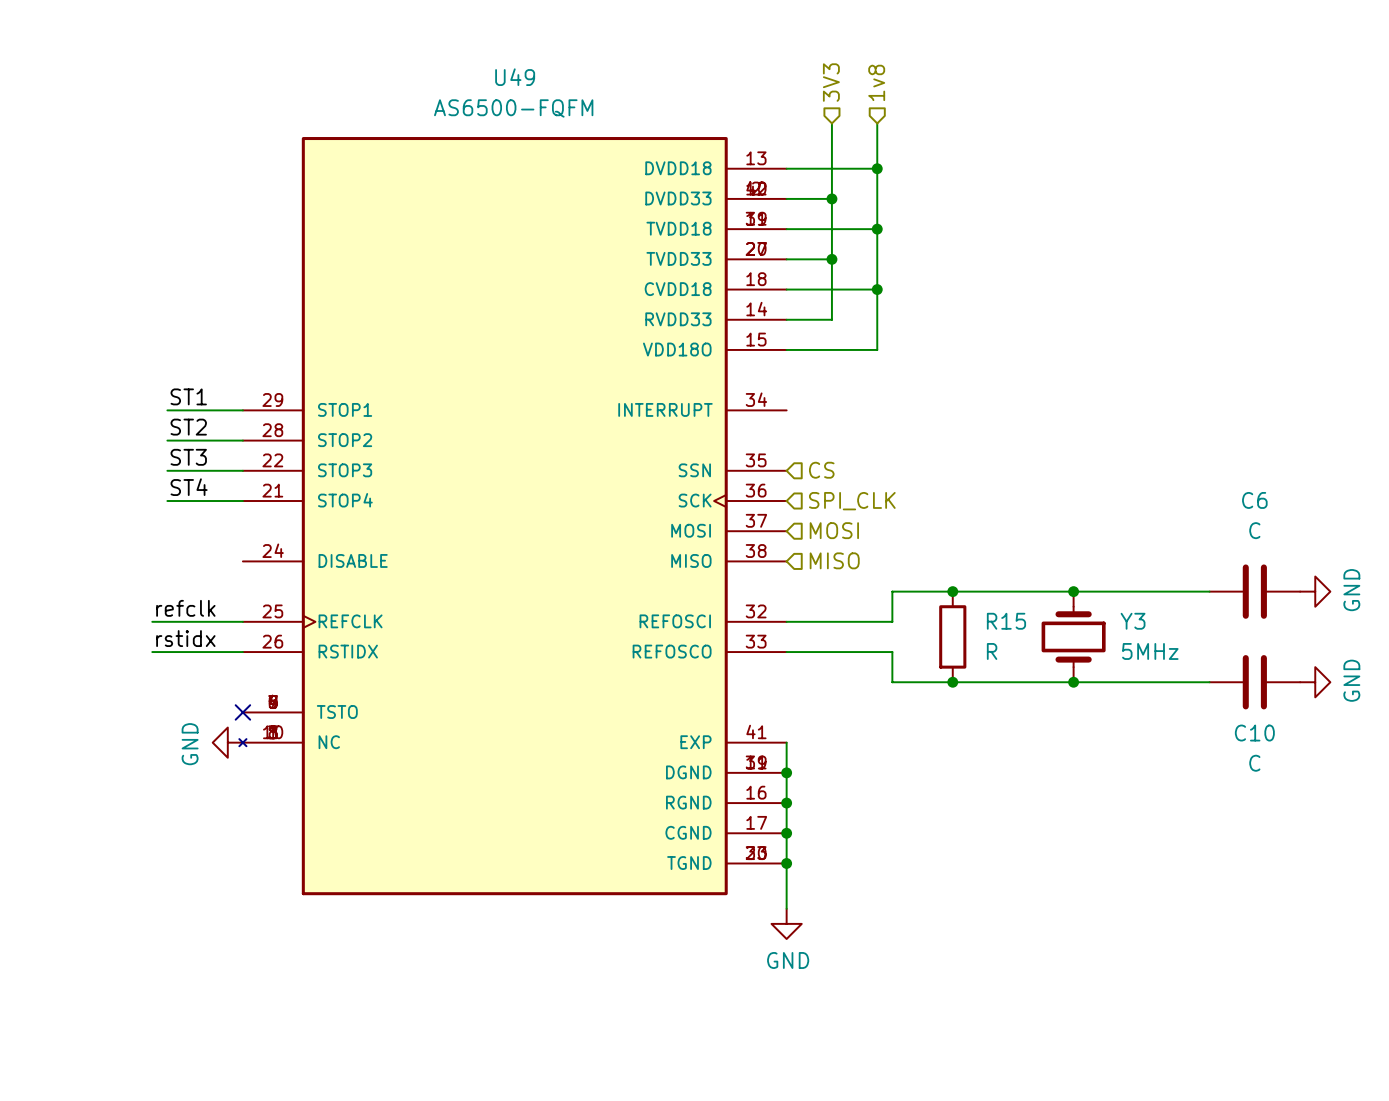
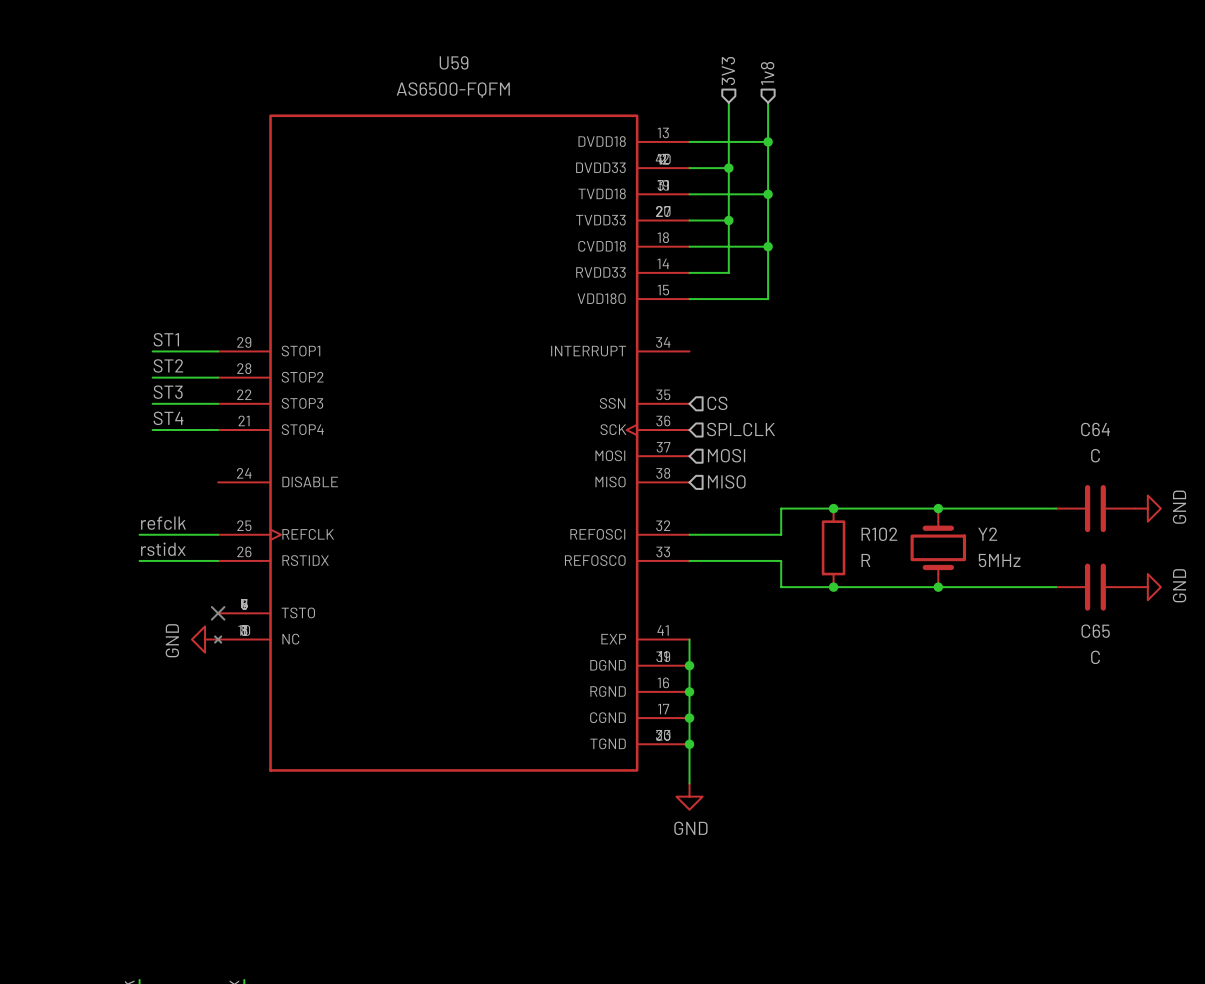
U49 name: U49 (515, 77) -> U59 (454, 62)
C6 name: C6 (1254, 500) -> C64 (1095, 429)
R15 name: R15 (1006, 621) -> R102 (879, 534)
Y3 name: Y3 (1133, 621) -> Y2 (987, 534)
C10 name: C10 (1254, 733) -> C65 (1095, 631)

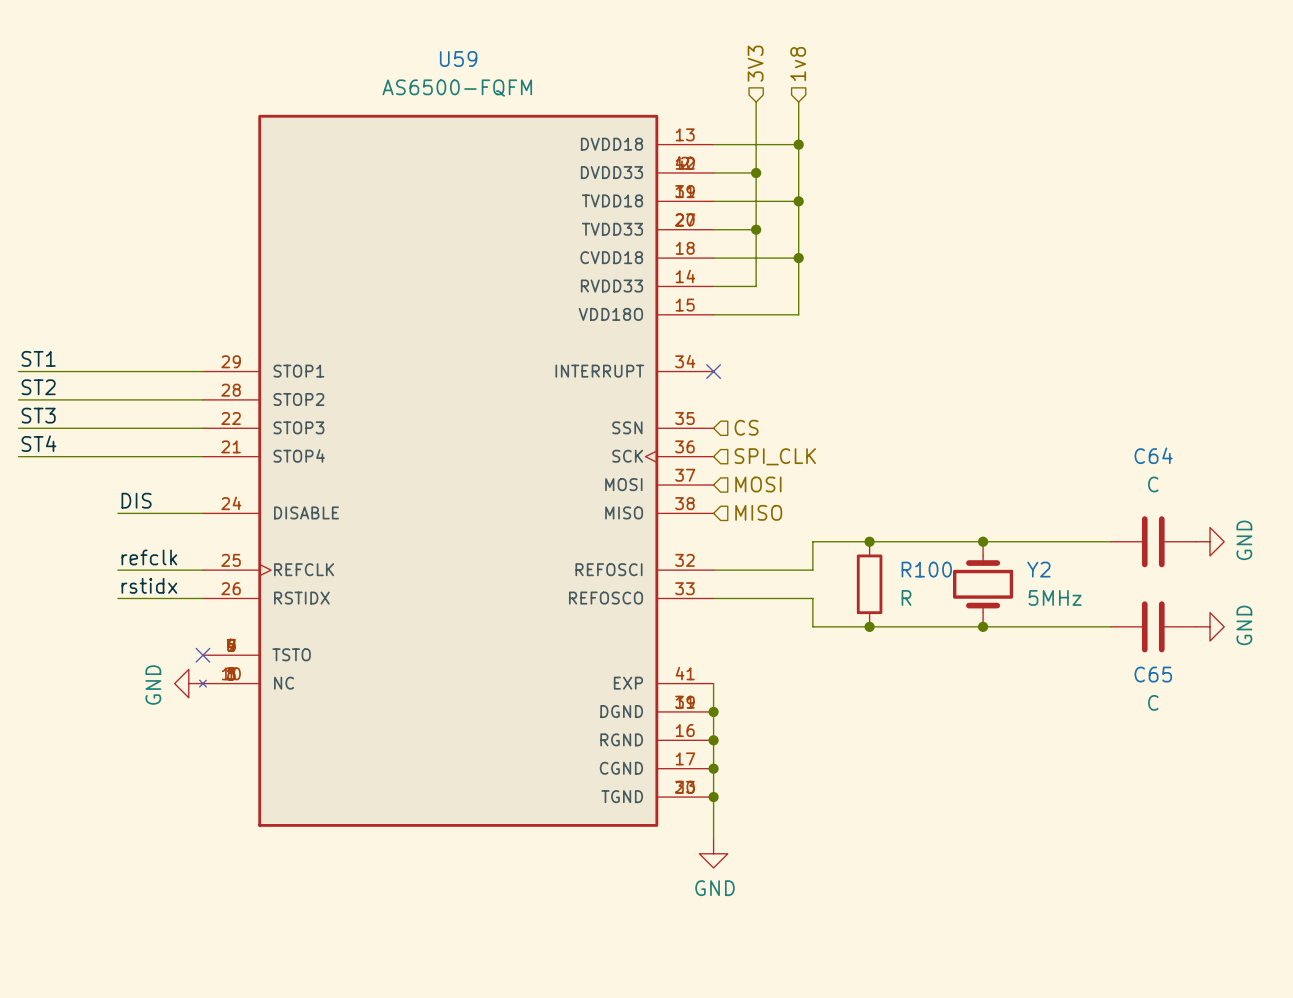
label position: ST1 (166, 339) -> ST1 (38, 358)
wire: none -> (18, 371) (132, 371)
no-connect mark: none -> (713, 371)
label position: ST2 (168, 365) -> ST2 (38, 387)
wire: none -> (18, 399) (132, 399)
label position: ST3 (168, 392) -> ST3 (38, 415)
wire: none -> (18, 428) (132, 428)
label position: ST4 (168, 418) -> ST4 (38, 443)
wire: none -> (18, 456) (132, 456)
label: none -> DIS (136, 500)
wire: none -> (117, 513) (202, 513)
R102 name: R102 (879, 534) -> R100 (926, 569)

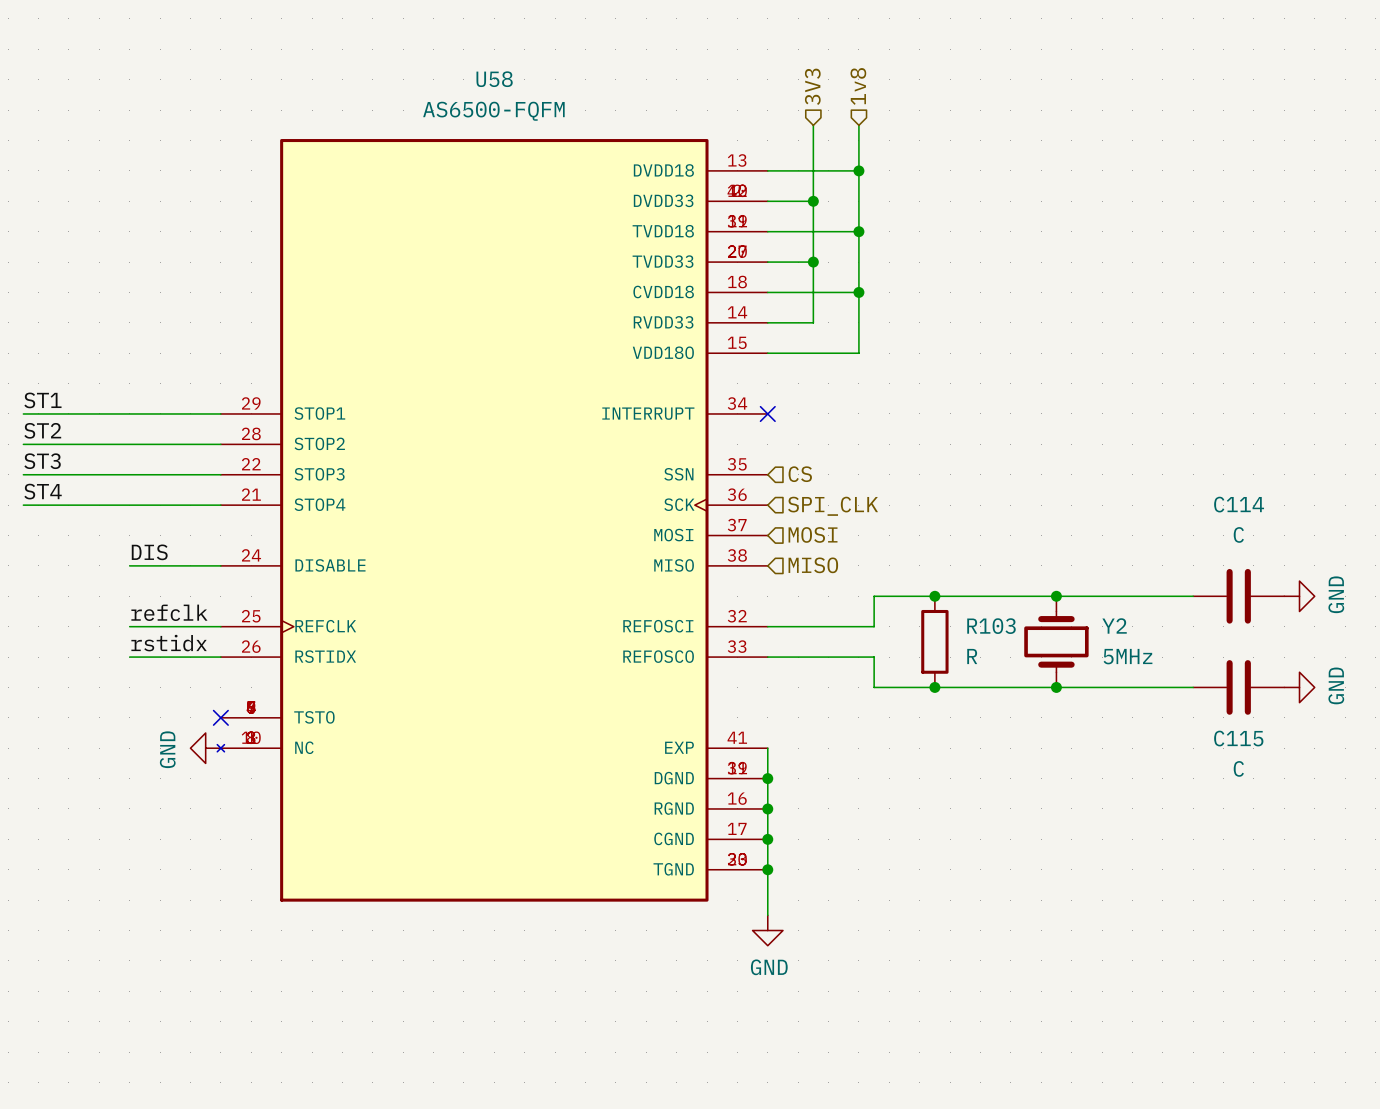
U59 name: U59 (458, 58) -> U58 (494, 79)
C64 name: C64 (1153, 455) -> C114 (1239, 504)
R100 name: R100 (926, 569) -> R103 (991, 626)
C65 name: C65 (1153, 674) -> C115 (1238, 738)

